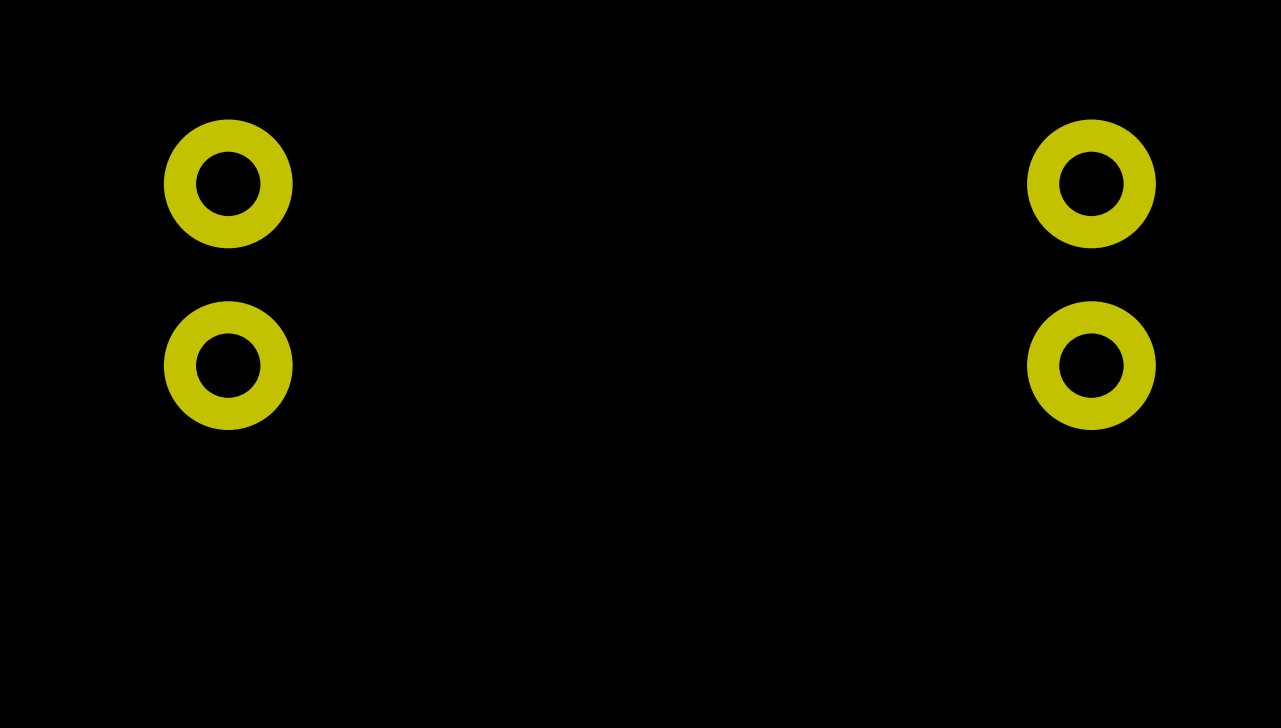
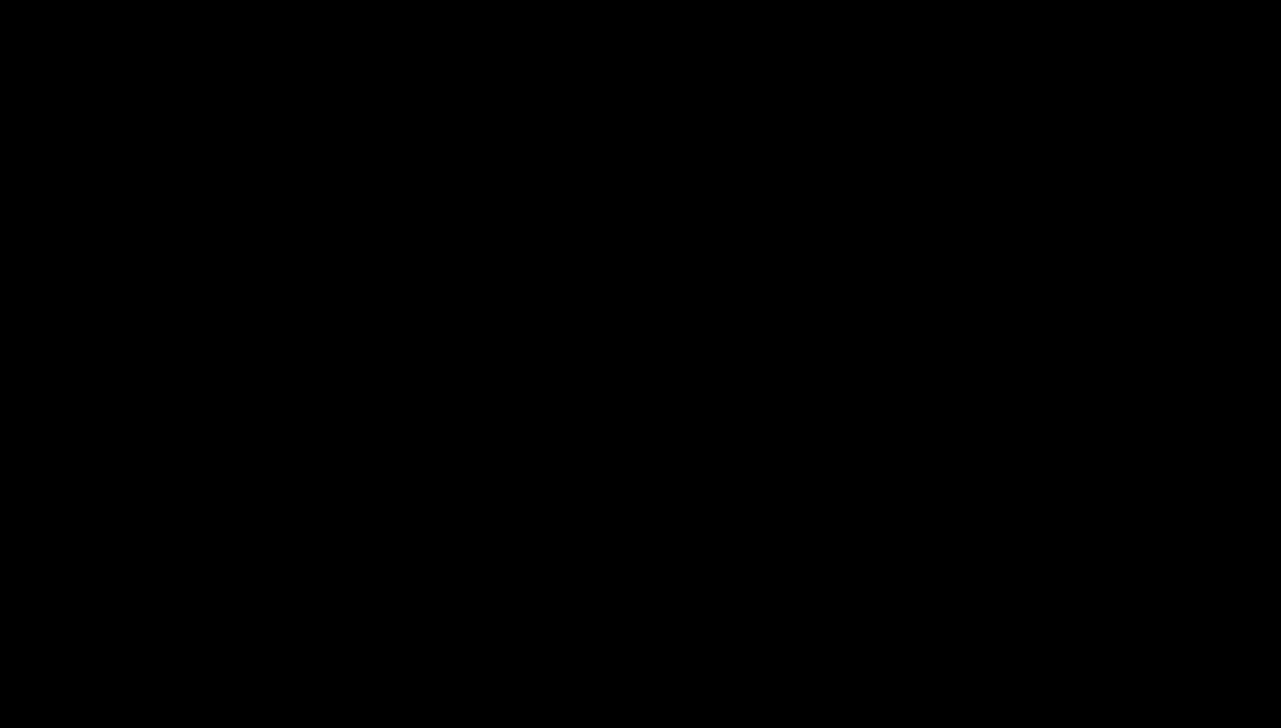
part: (228, 274) -> none
part: (1091, 274) -> none

